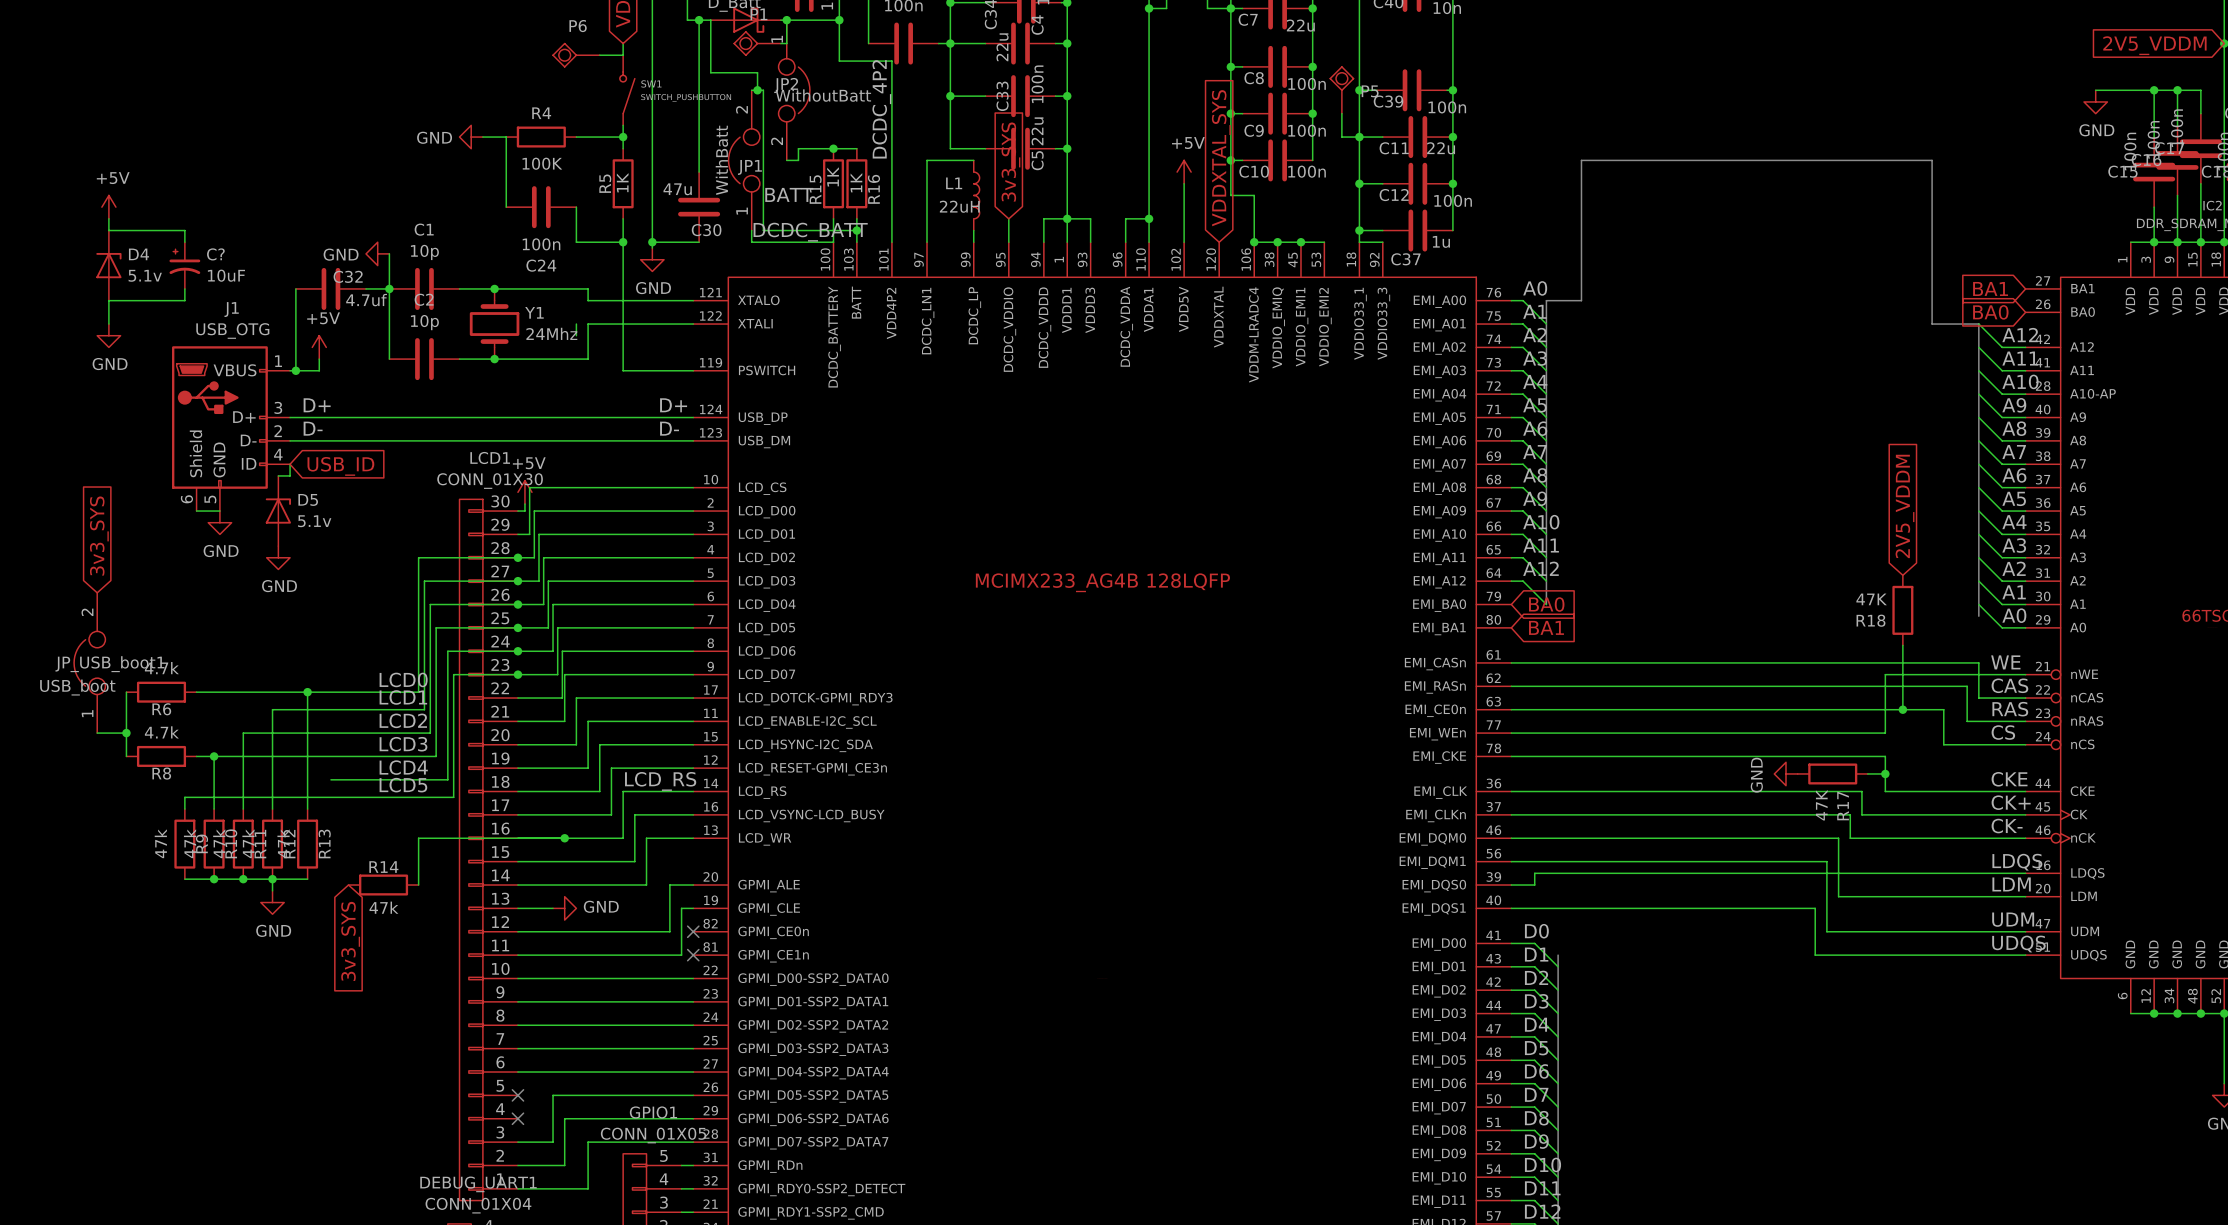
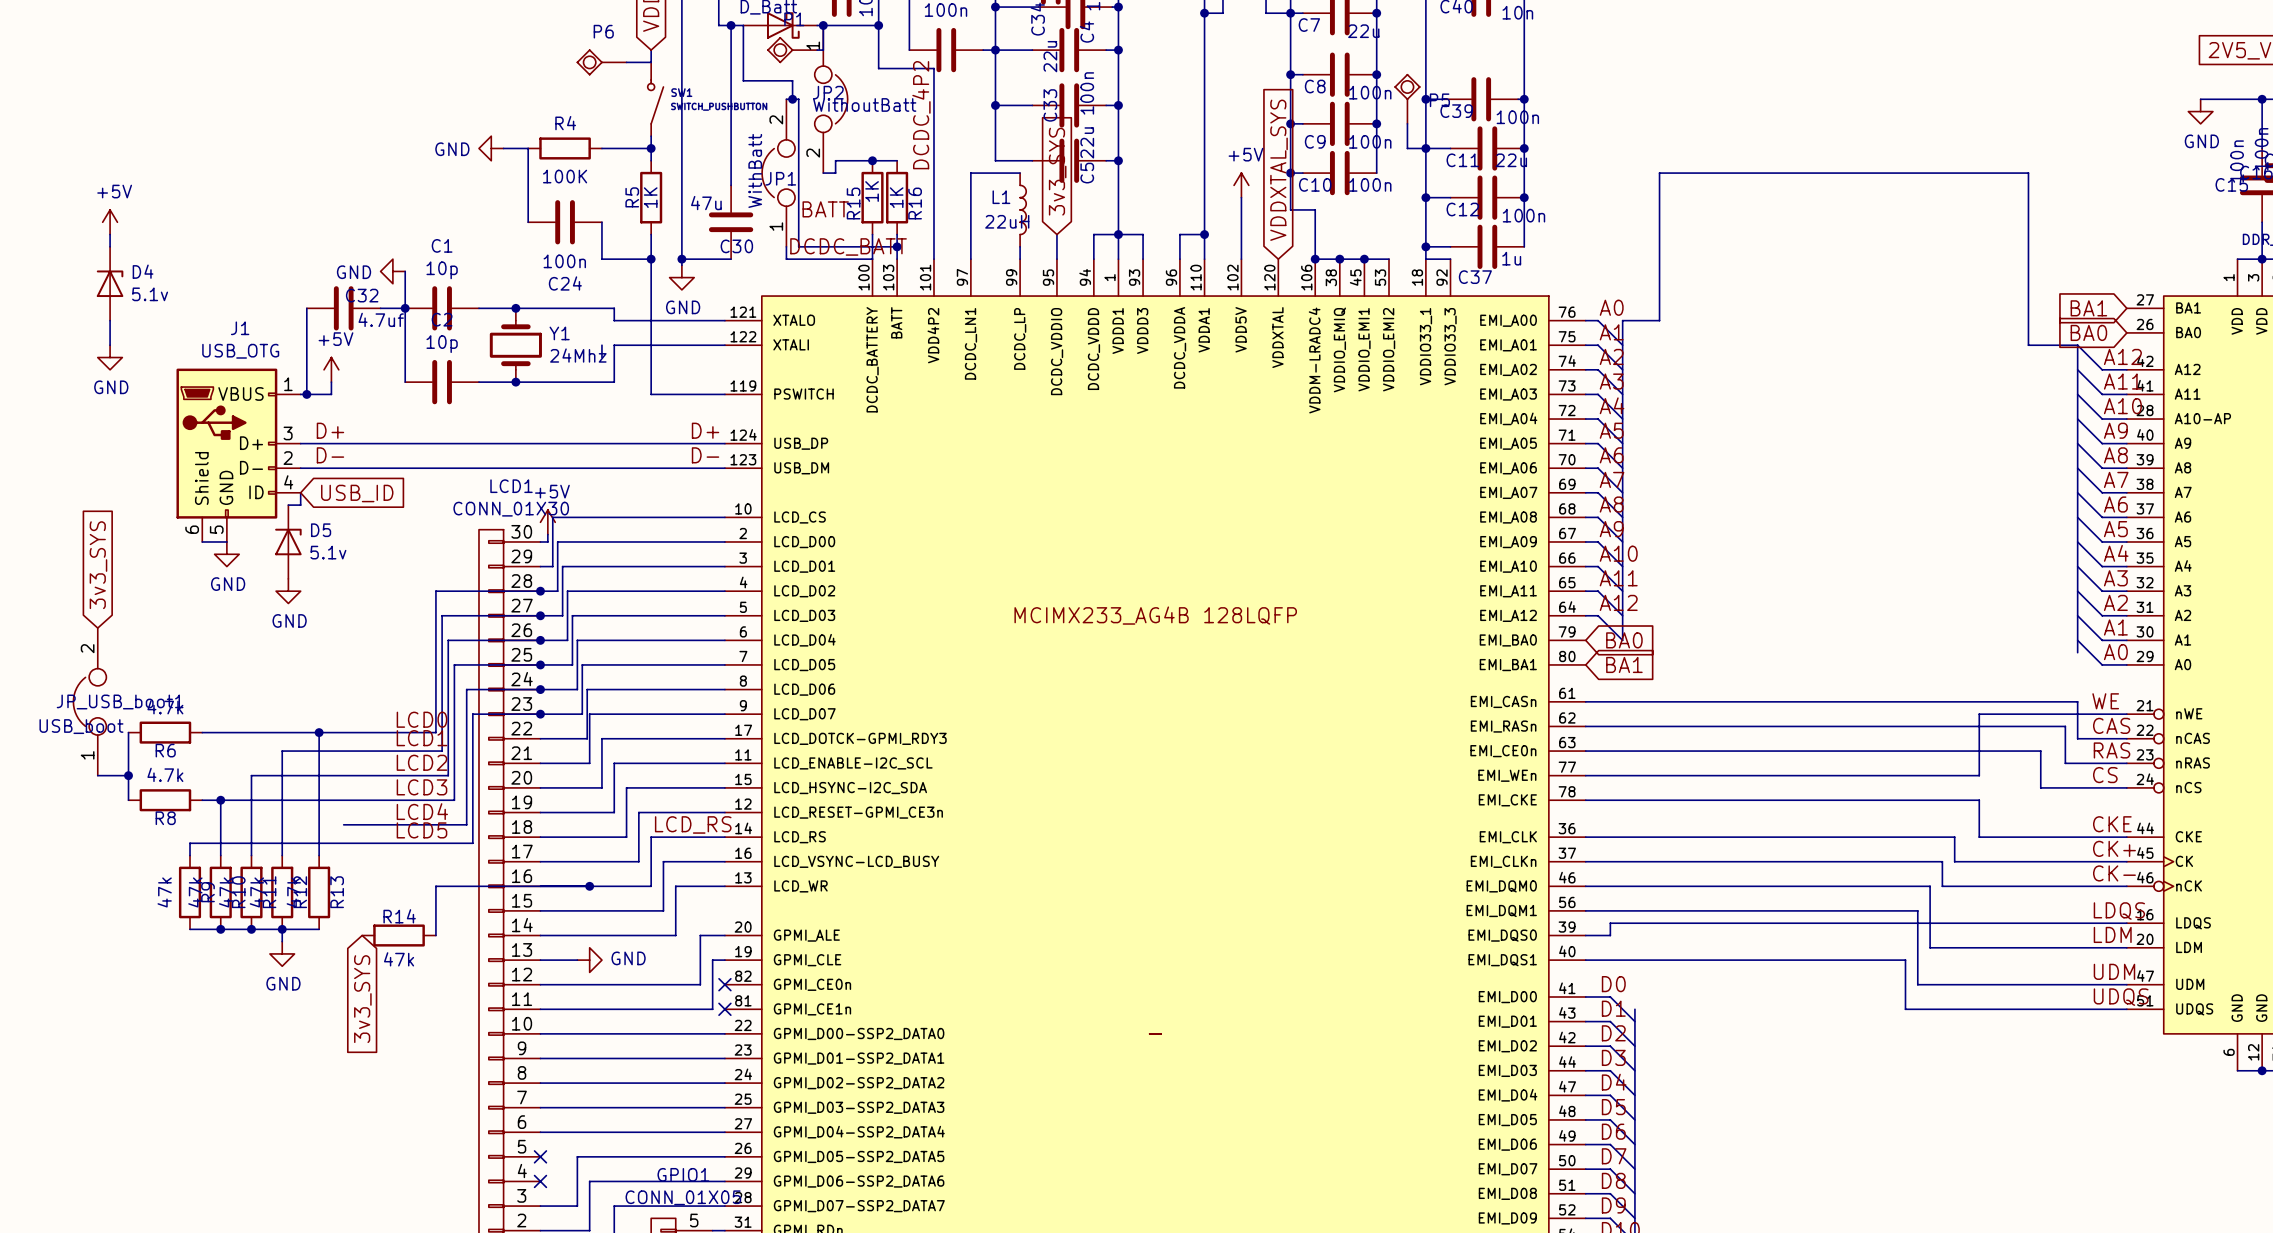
wire: (108, 230) (184, 230) (184, 242) -> none
C?: 10uF (184, 265) -> none
wire: (184, 288) (184, 300) (108, 300) -> none
global label: 2V5_VDDM (1905, 506) -> none
R18: 47K (1902, 610) -> none
wire: (1902, 645) (1902, 709) -> none
junction: (1902, 709) -> none
power symbol: GND (1786, 773) -> none
R17: 47K (1832, 773) -> none
wire: (1867, 773) (1885, 773) -> none
junction: (1885, 773) -> none

